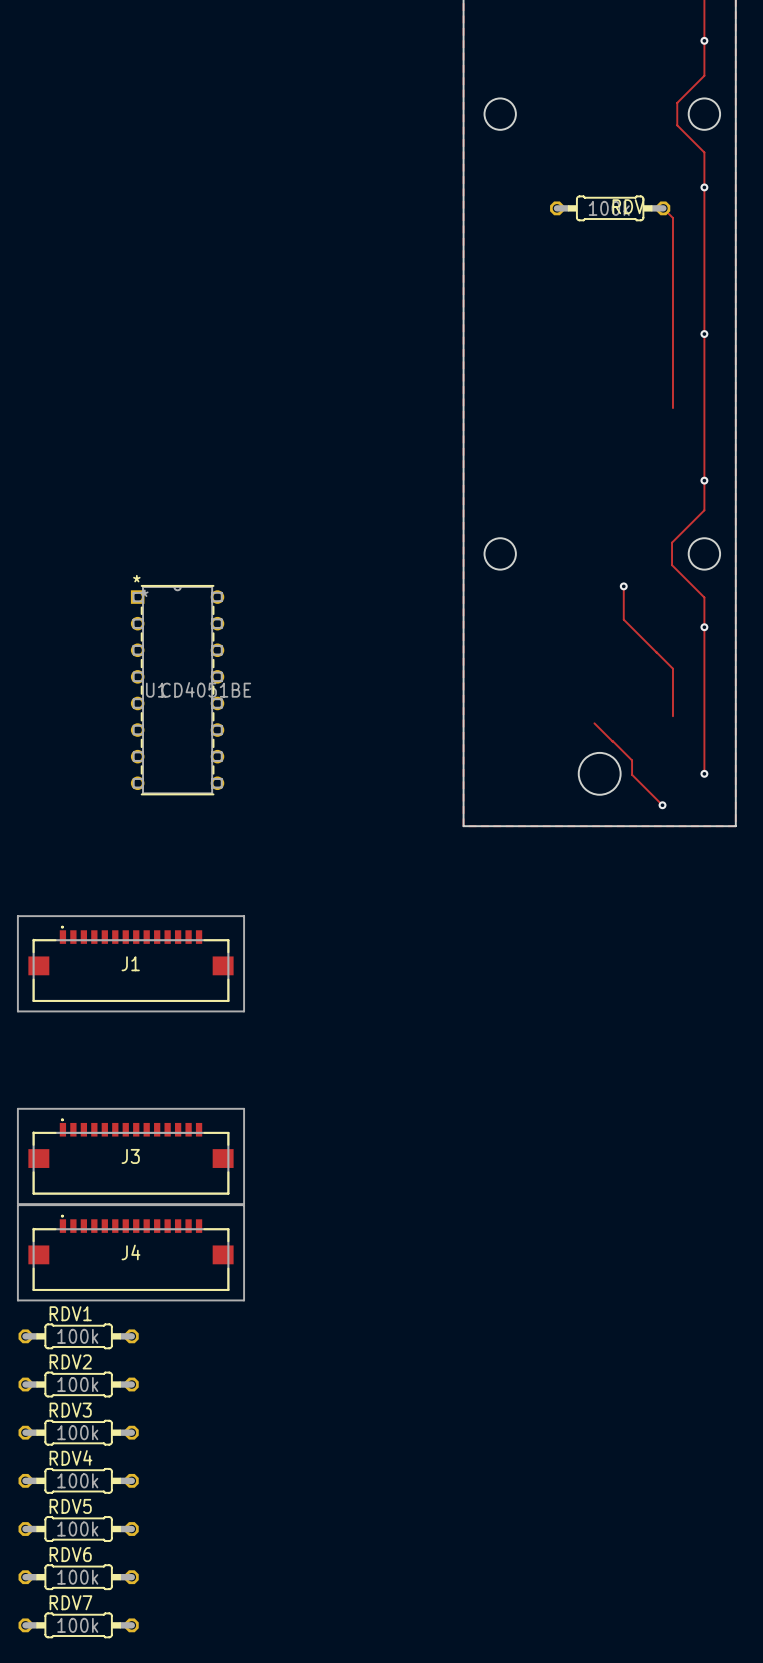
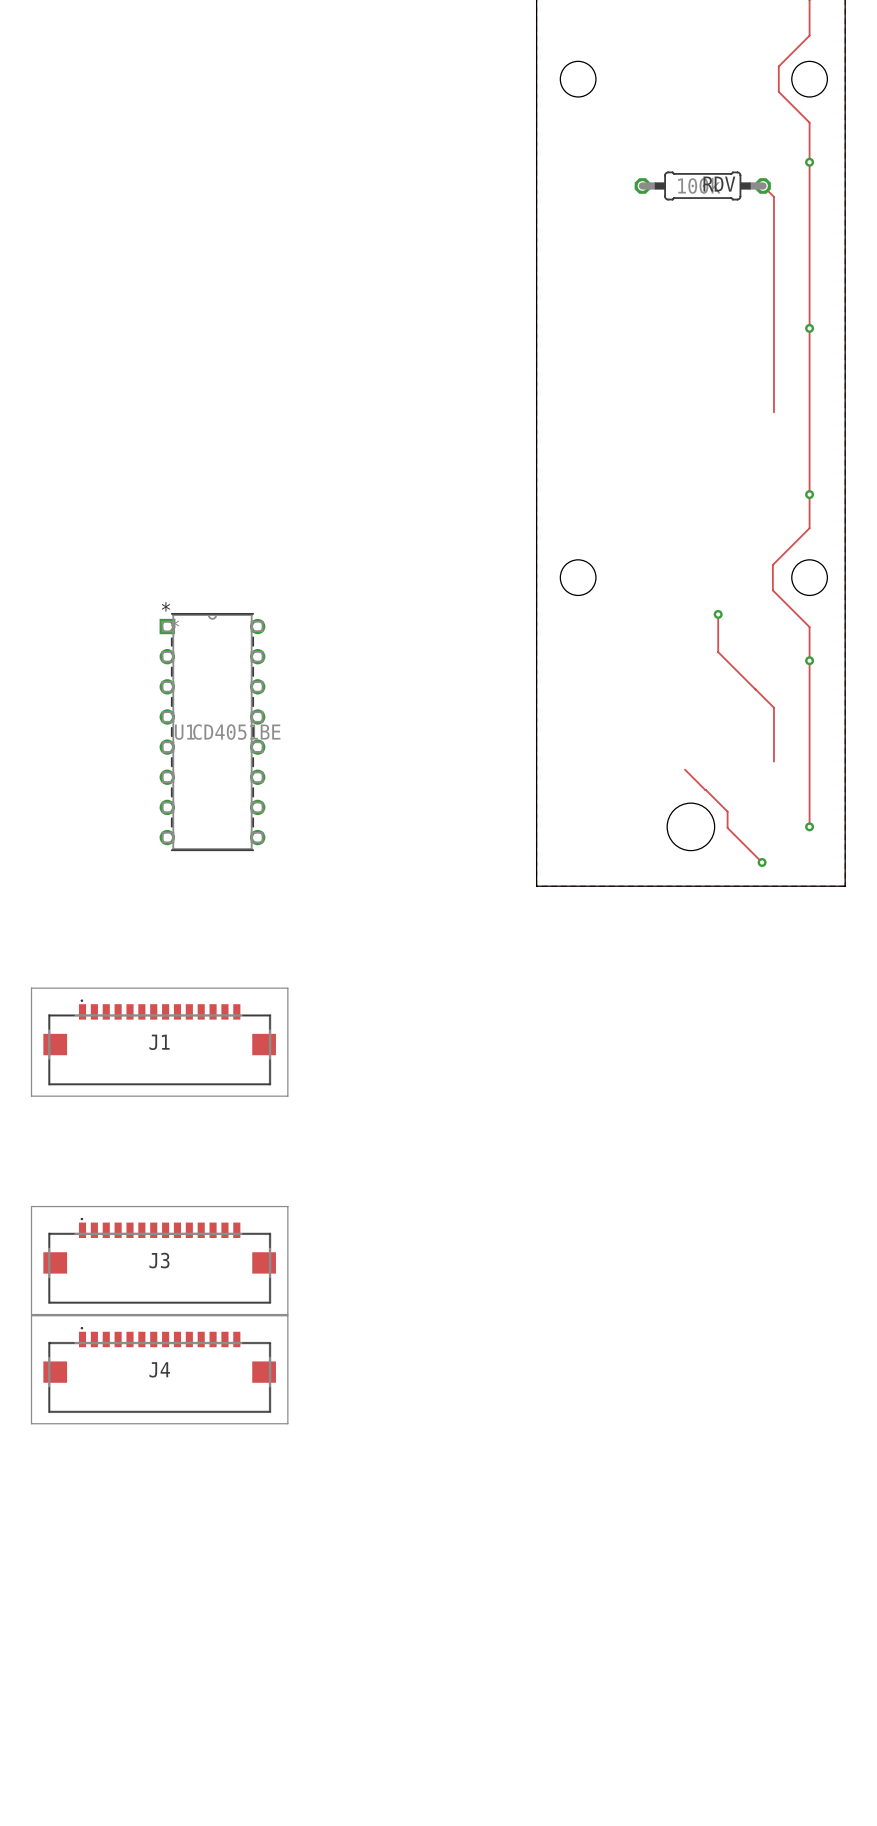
RDV1: 100k (78, 1336) -> none
RDV2: 100k (78, 1384) -> none
RDV3: 100k (78, 1432) -> none
RDV4: 100k (78, 1480) -> none
RDV5: 100k (78, 1529) -> none
RDV6: 100k (78, 1577) -> none
RDV7: 100k (78, 1625) -> none

